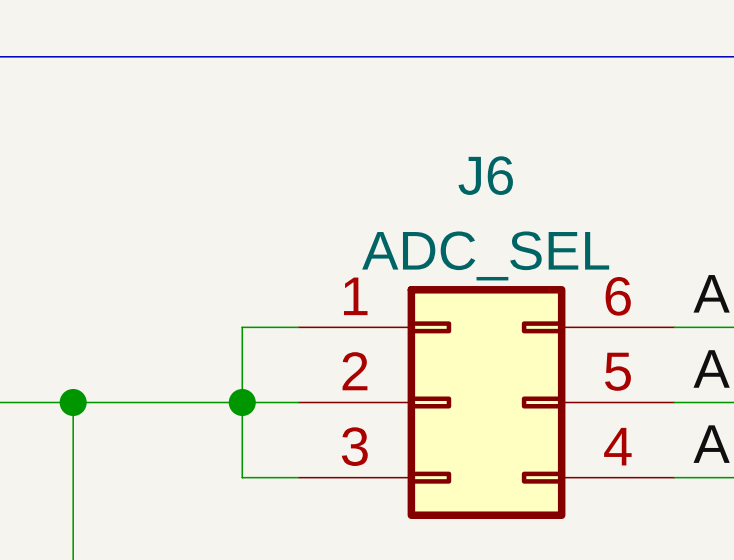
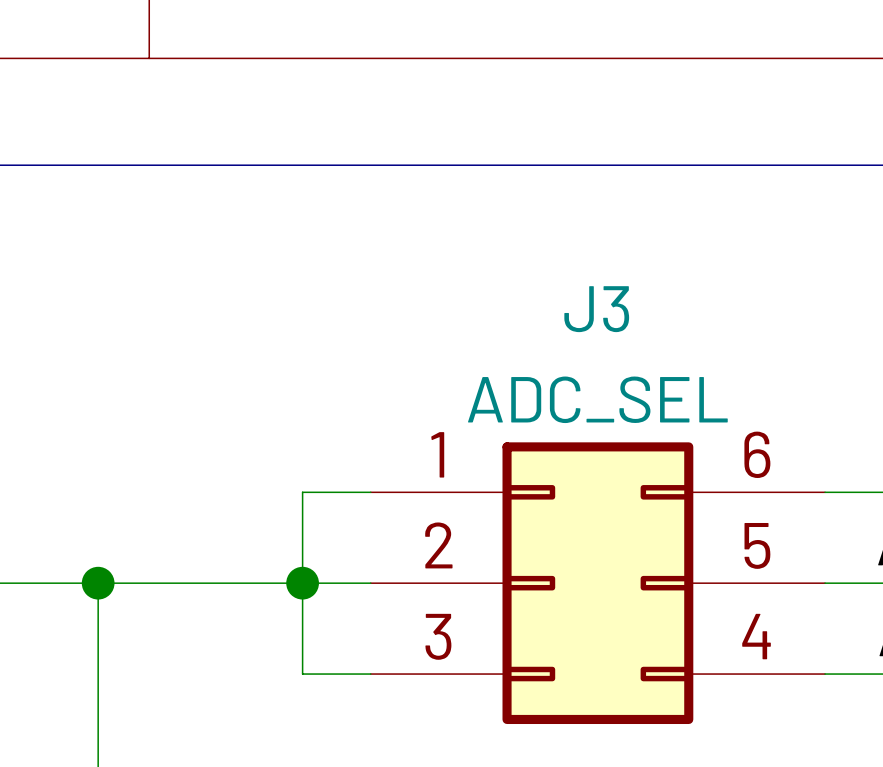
J6 name: J6 (485, 175) -> J3 (596, 309)

